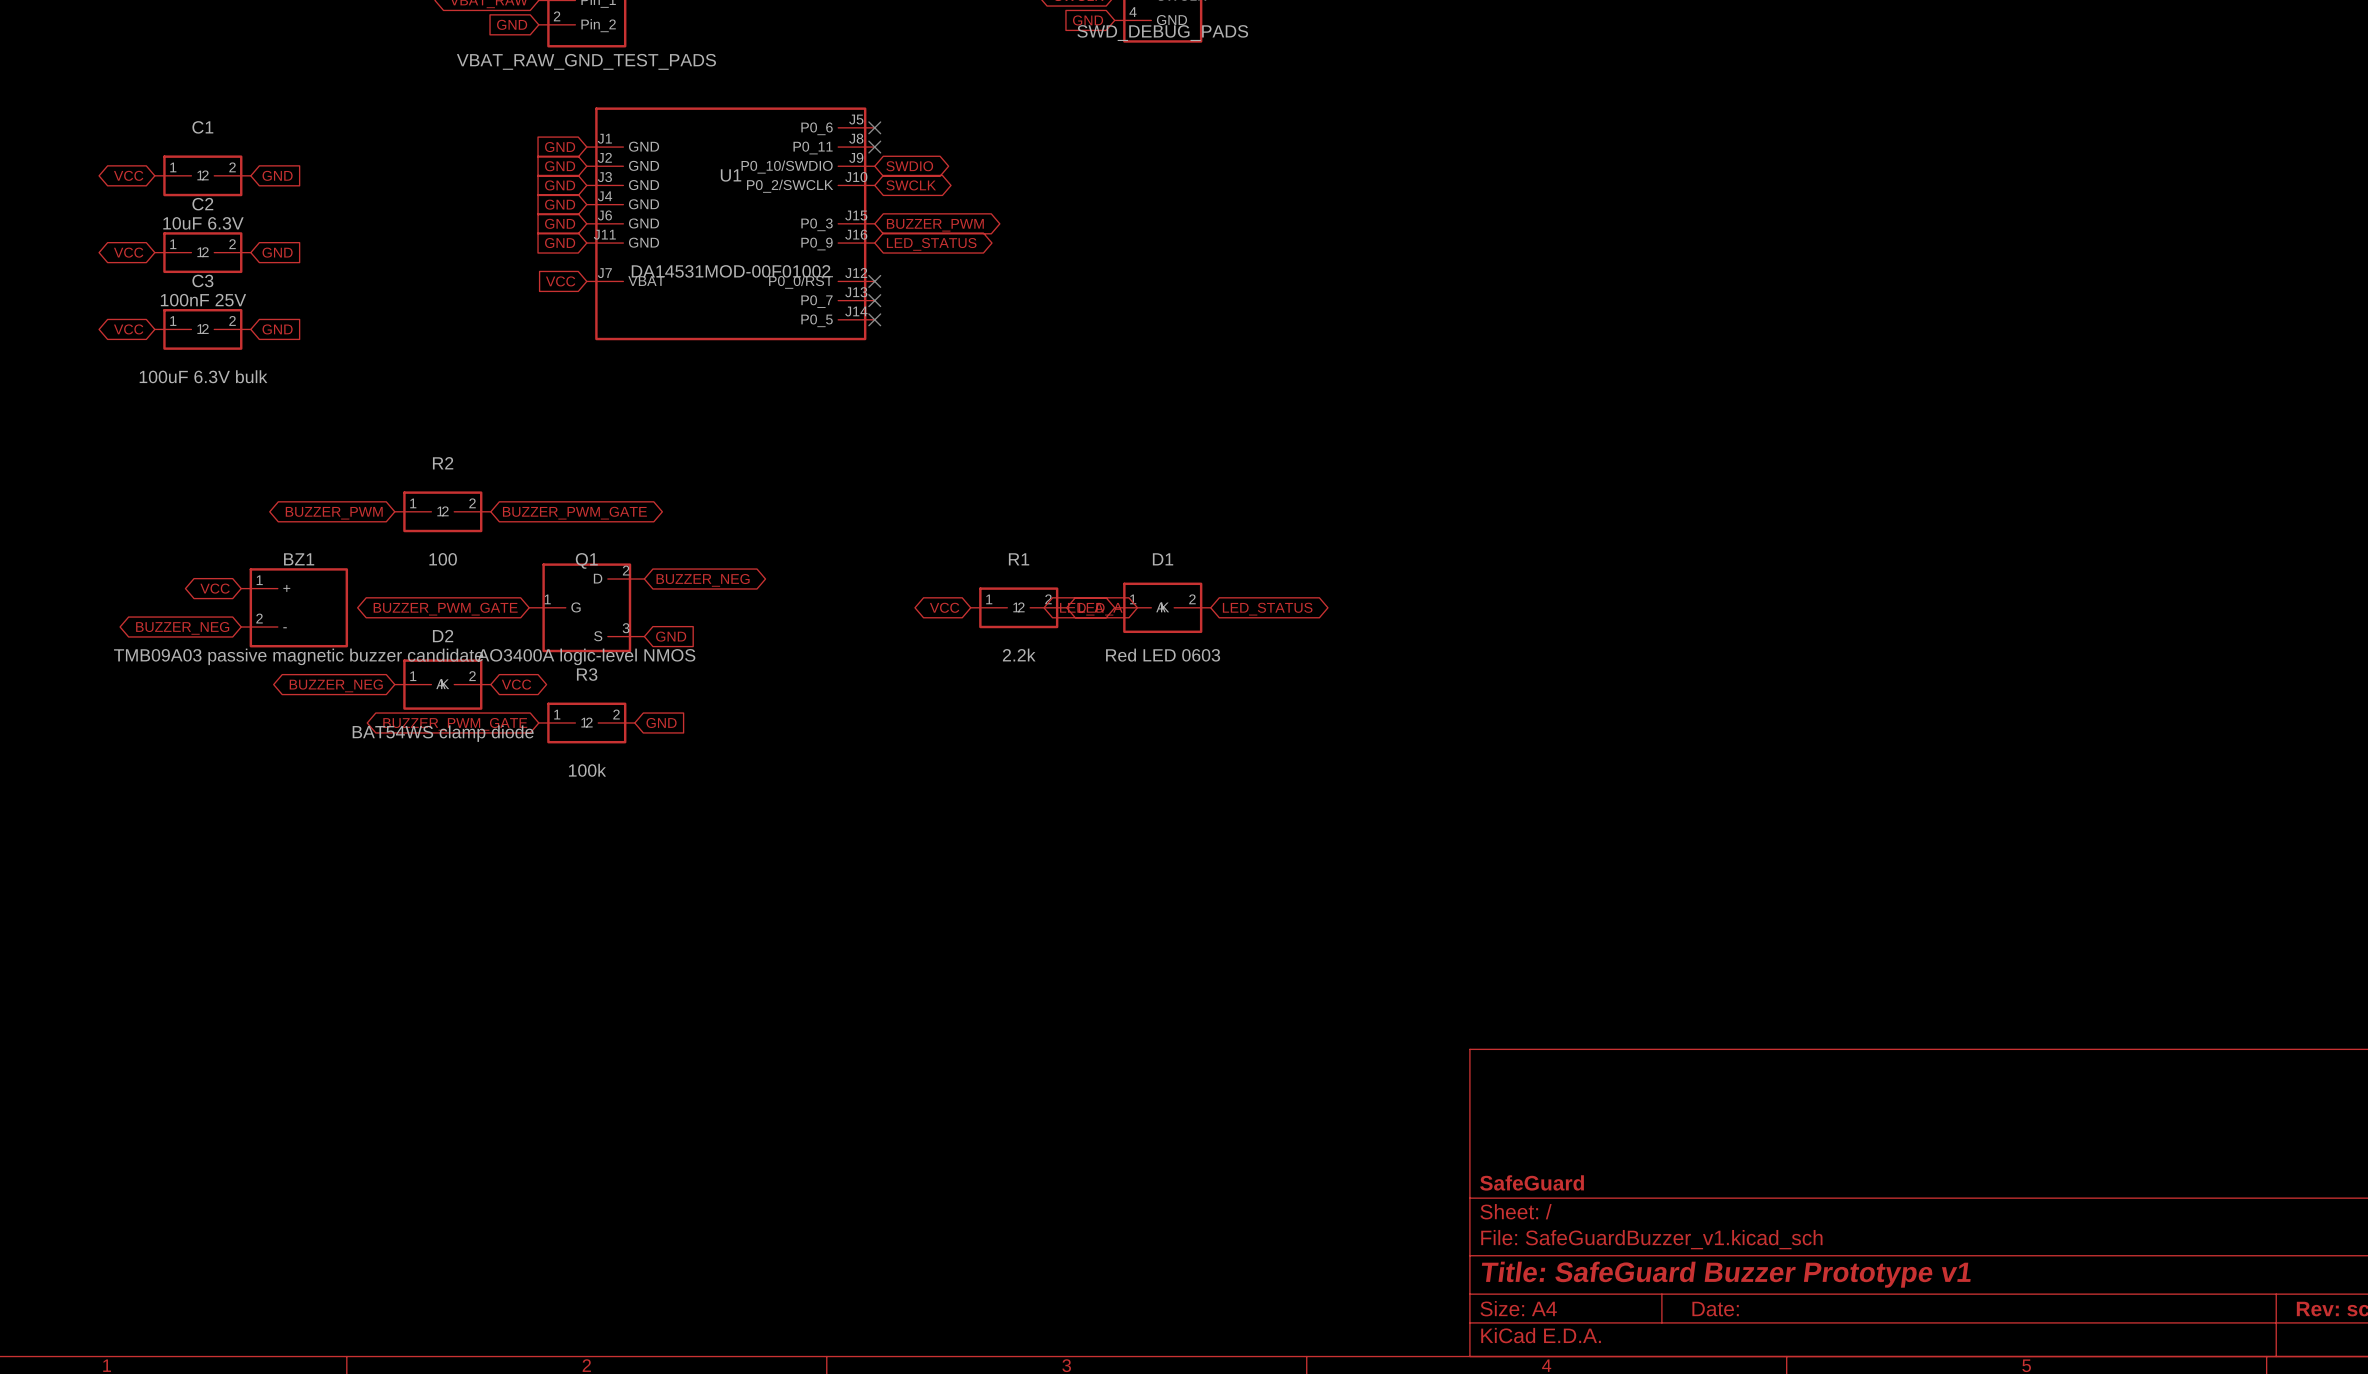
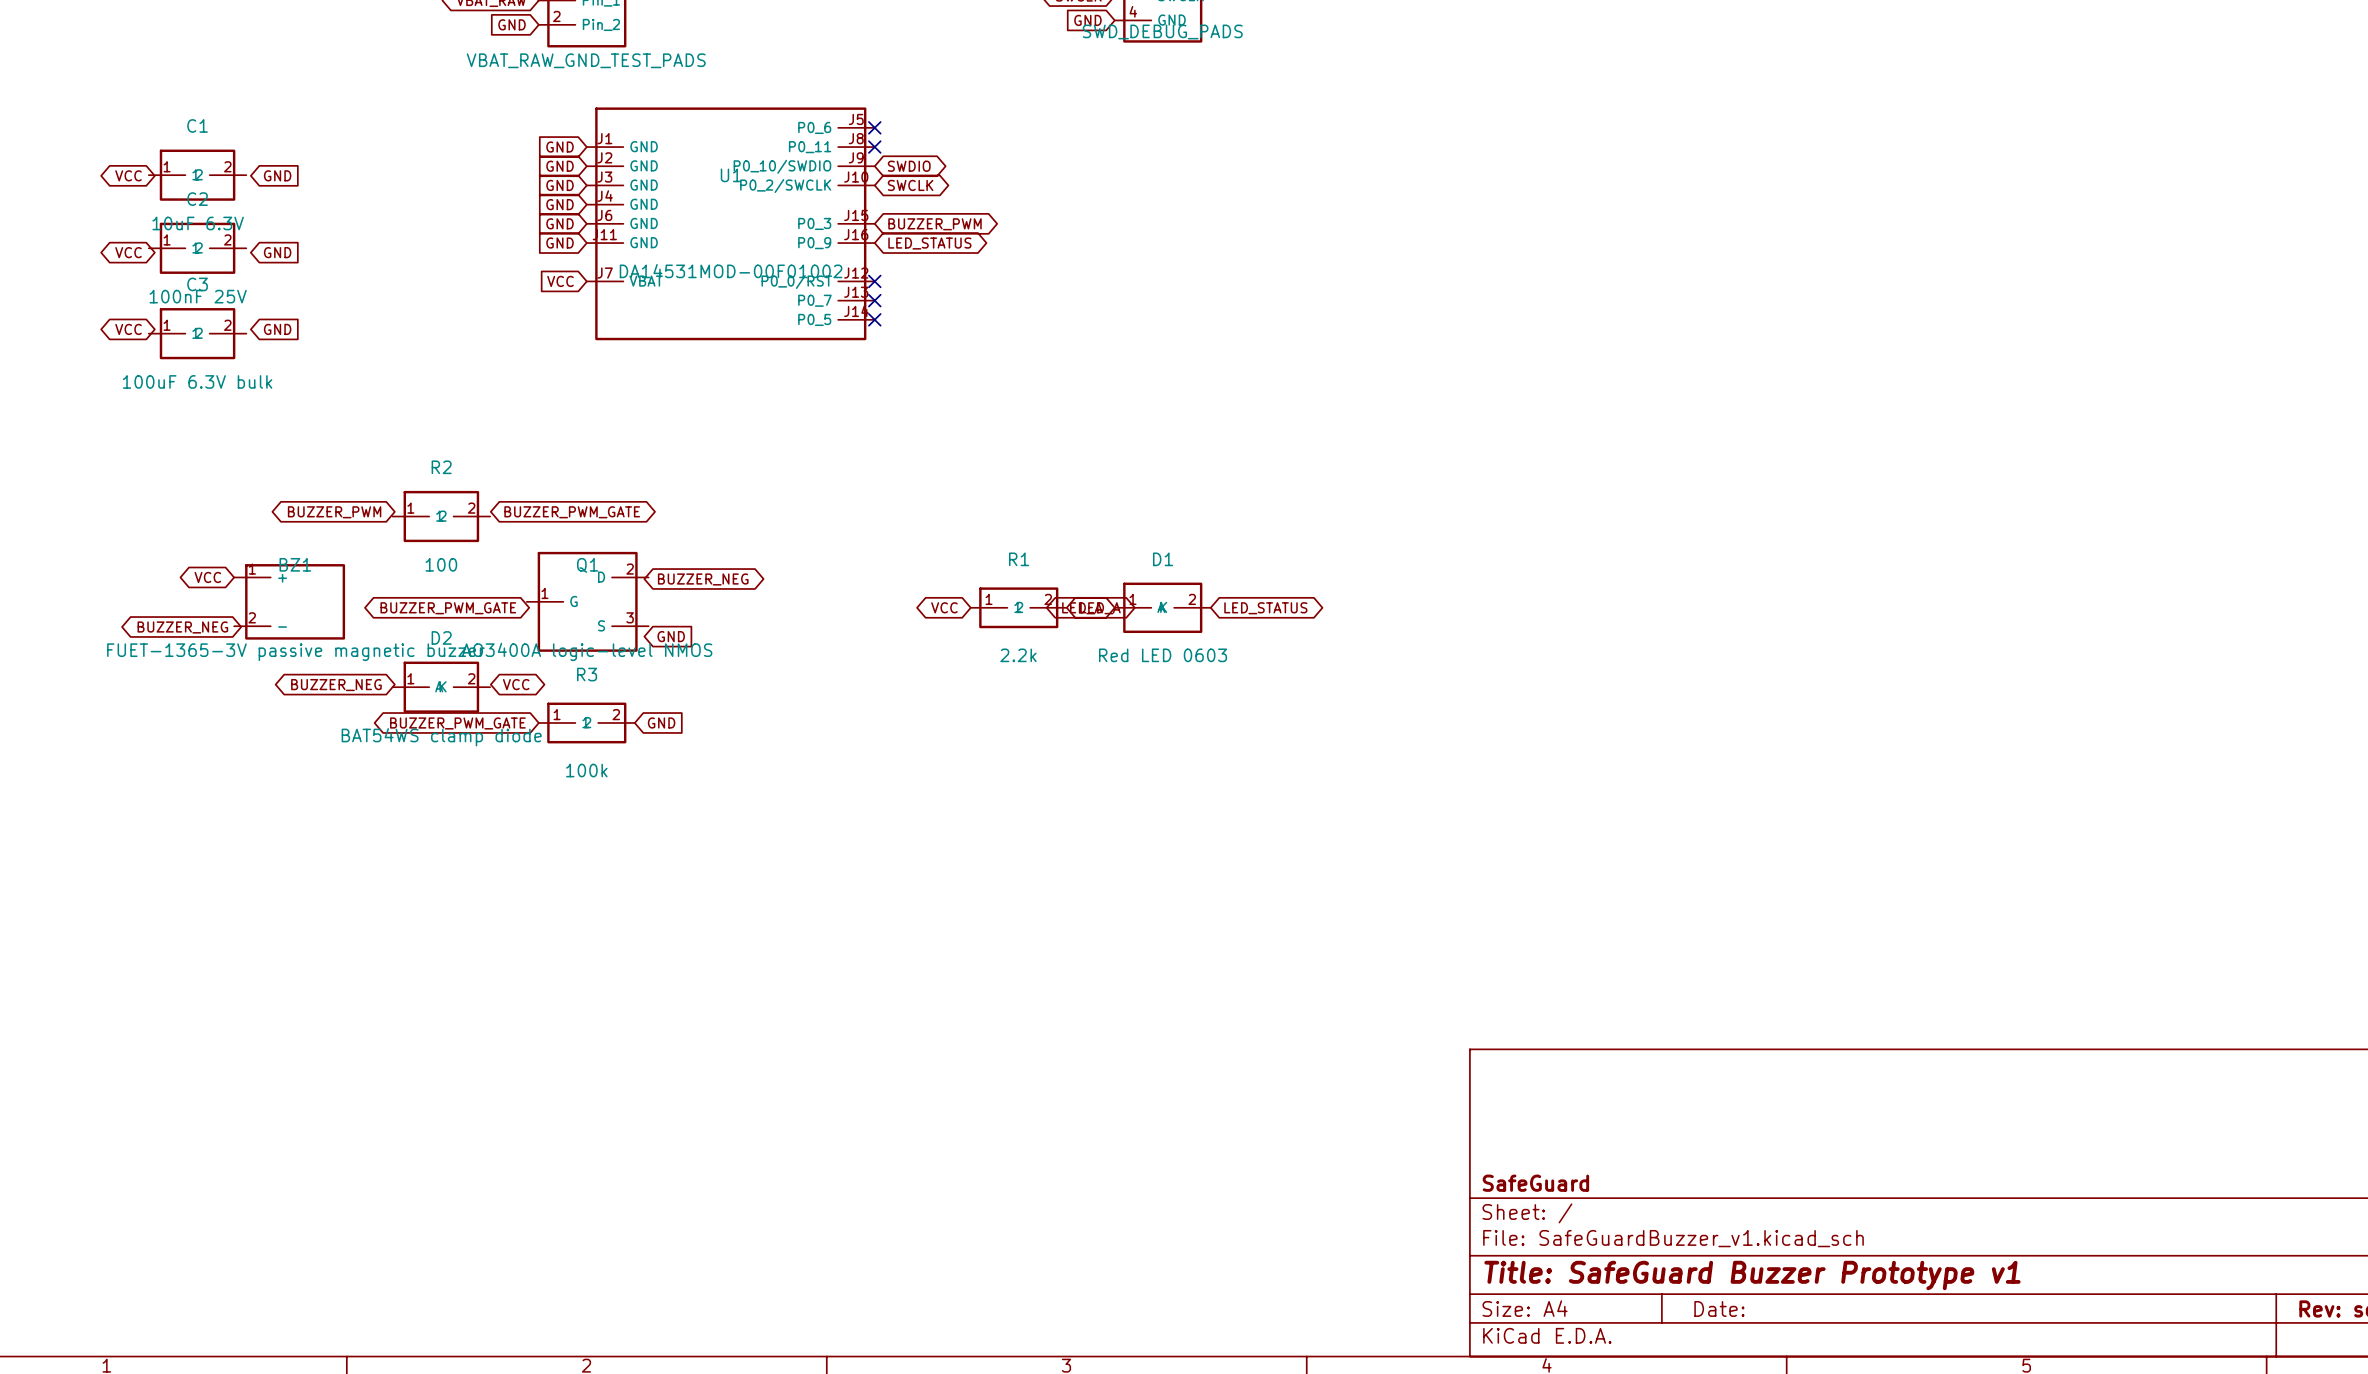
C1 symbol: [154, 155, 251, 197] -> [148, 149, 247, 201]
C2 symbol: [154, 232, 251, 274] -> [148, 222, 247, 274]
C3 symbol: [154, 309, 251, 350] -> [148, 308, 247, 360]
R2 symbol: [394, 491, 491, 533] -> [392, 490, 491, 543]
Q1 symbol: [529, 563, 645, 653] -> [526, 551, 649, 652]
BZ1 symbol: [241, 568, 349, 648] -> [234, 564, 346, 640]
global label position: VCC (215, 588) -> VCC (207, 577)
BZ1 value: TMB09A03 passive magnetic buzzer candidate (298, 656) -> FUET-1365-3V passive magnetic buzzer (295, 652)
D2 symbol: [394, 659, 491, 710] -> [392, 661, 491, 713]

